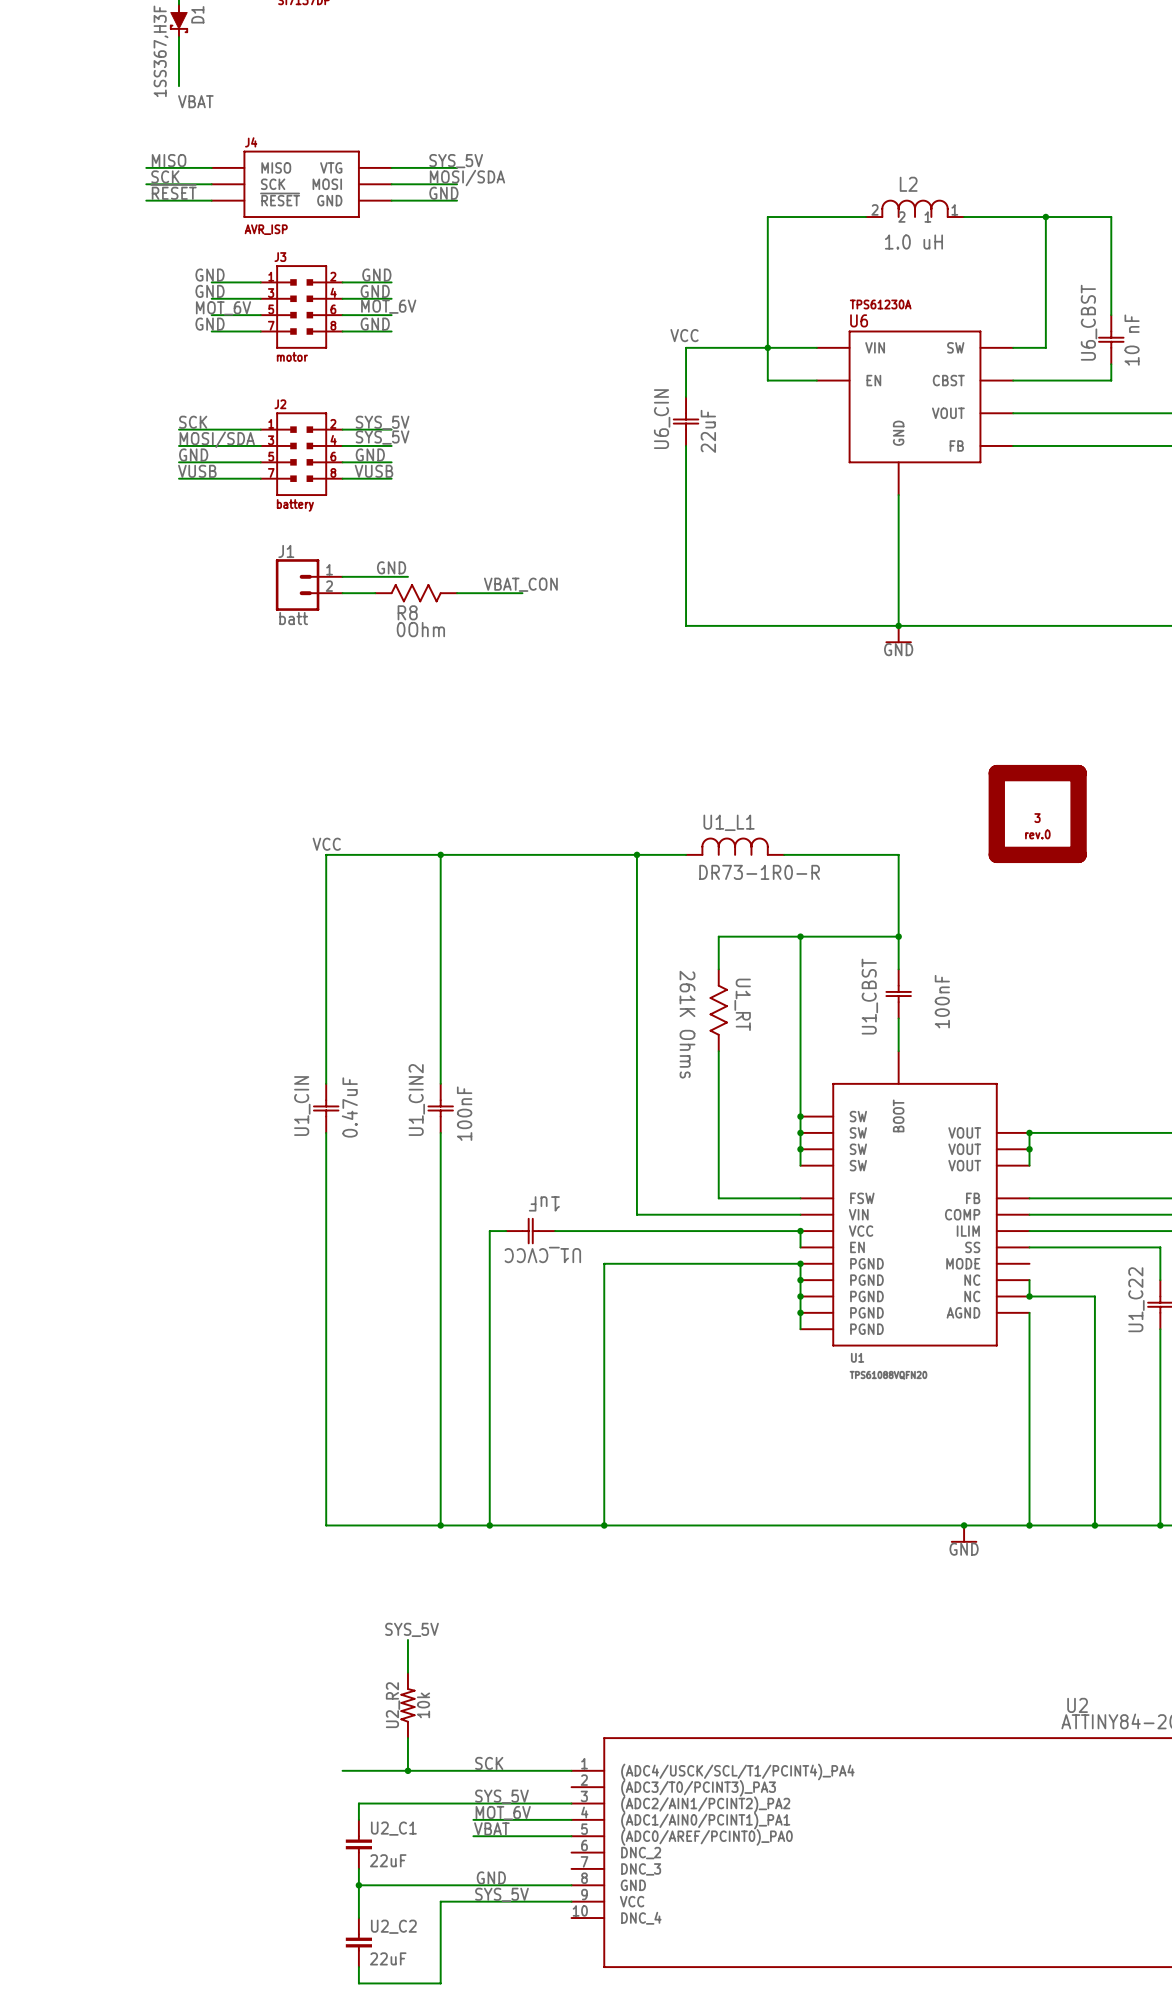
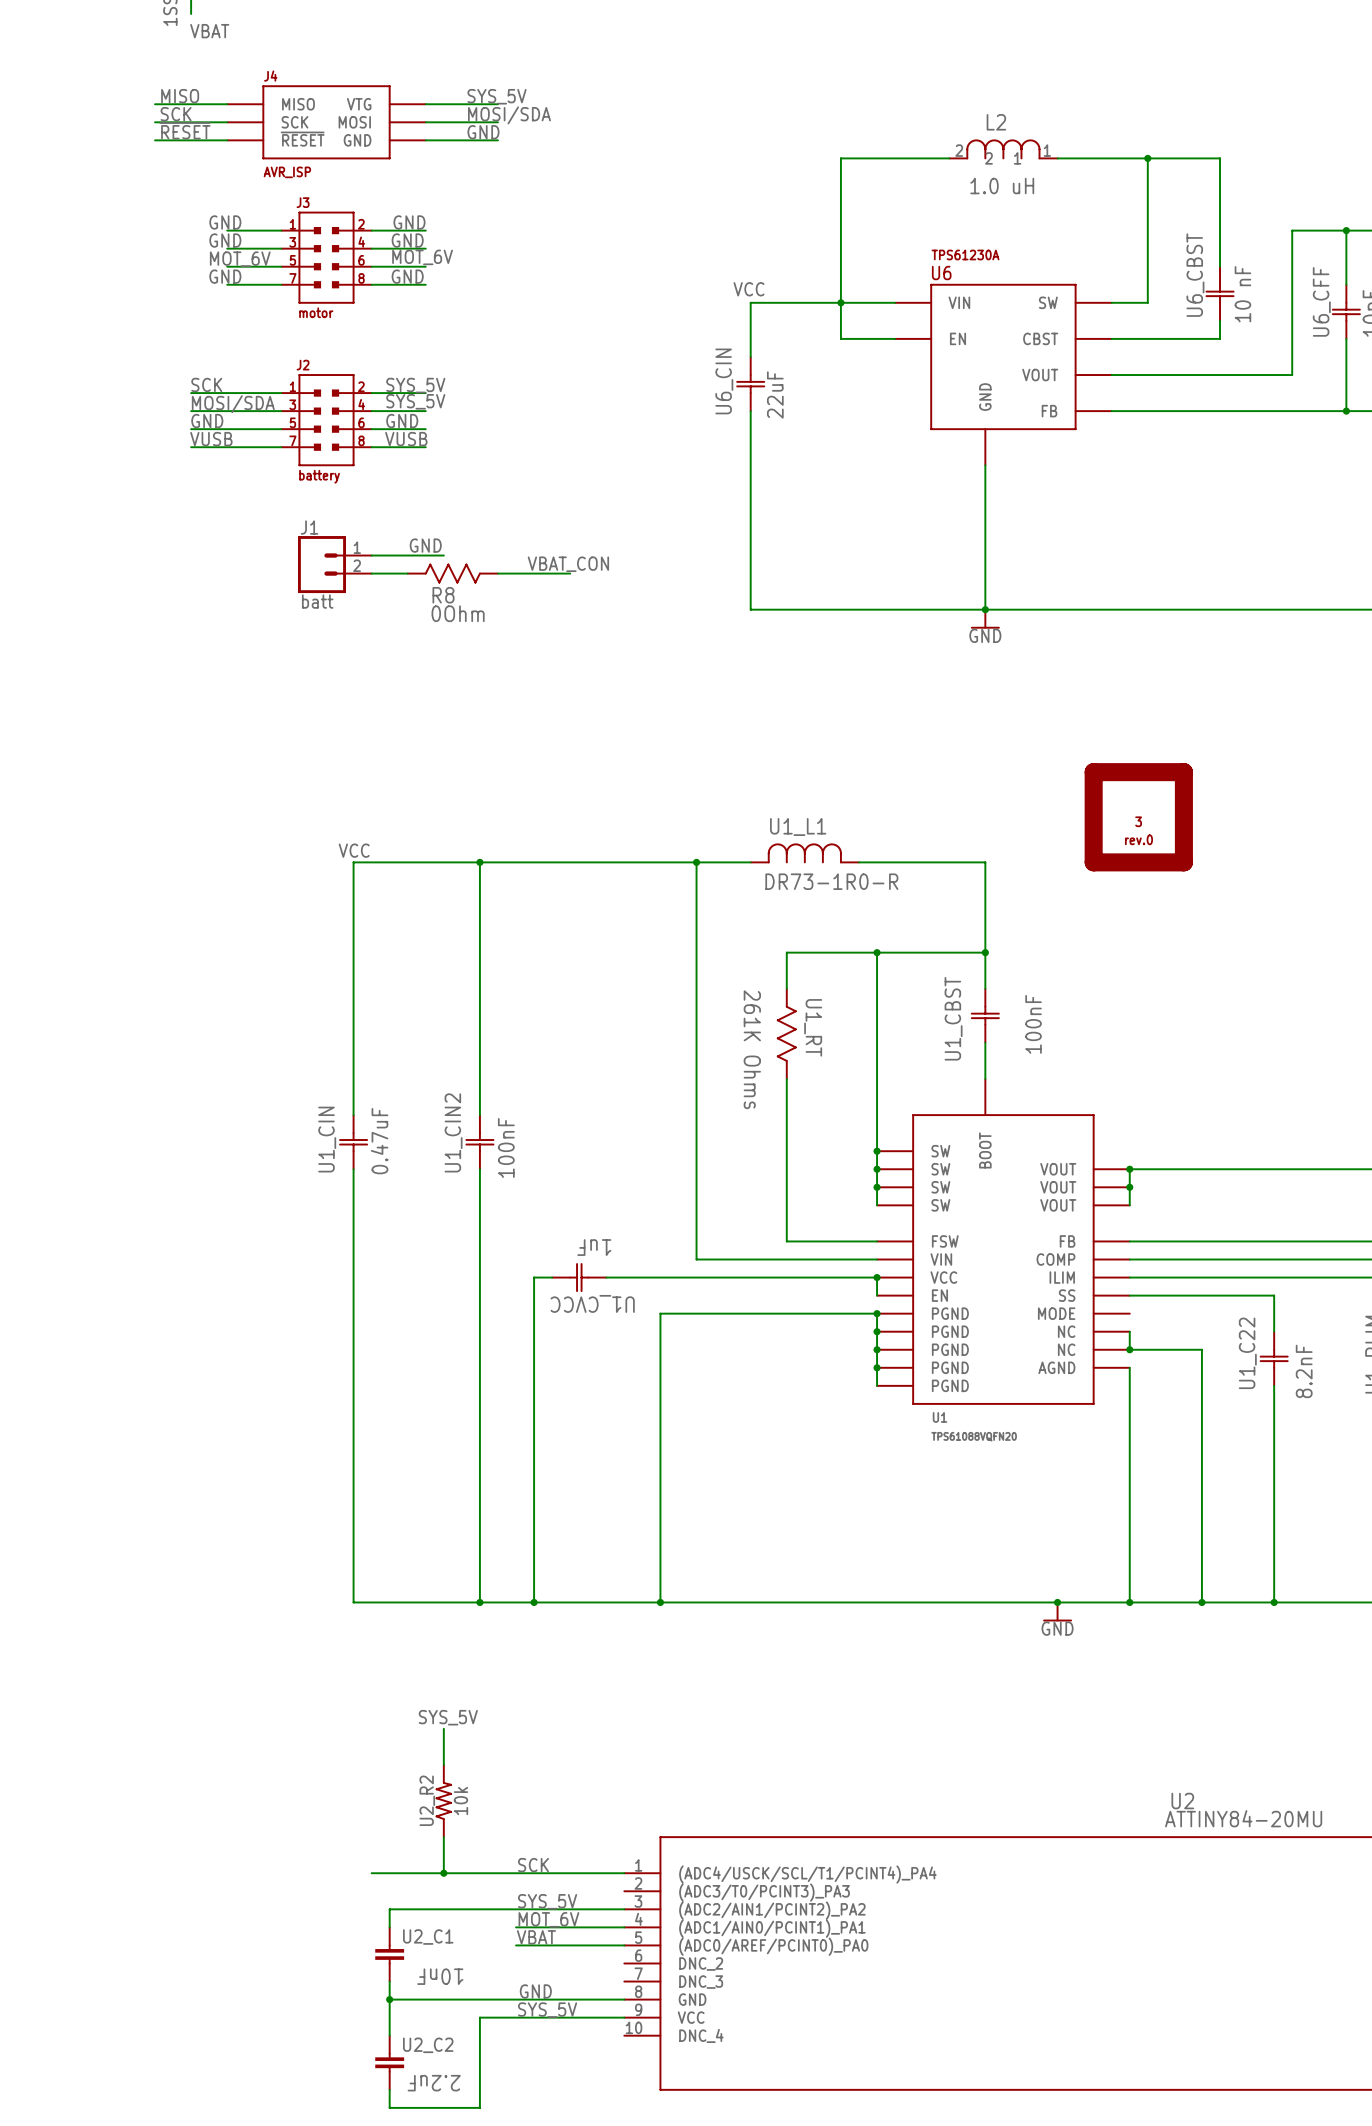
U2_C1 value: 22uF (388, 1860) -> 10nF (440, 1976)
U2_C2 value: 22uF (388, 1958) -> 2.2uF (434, 2083)

